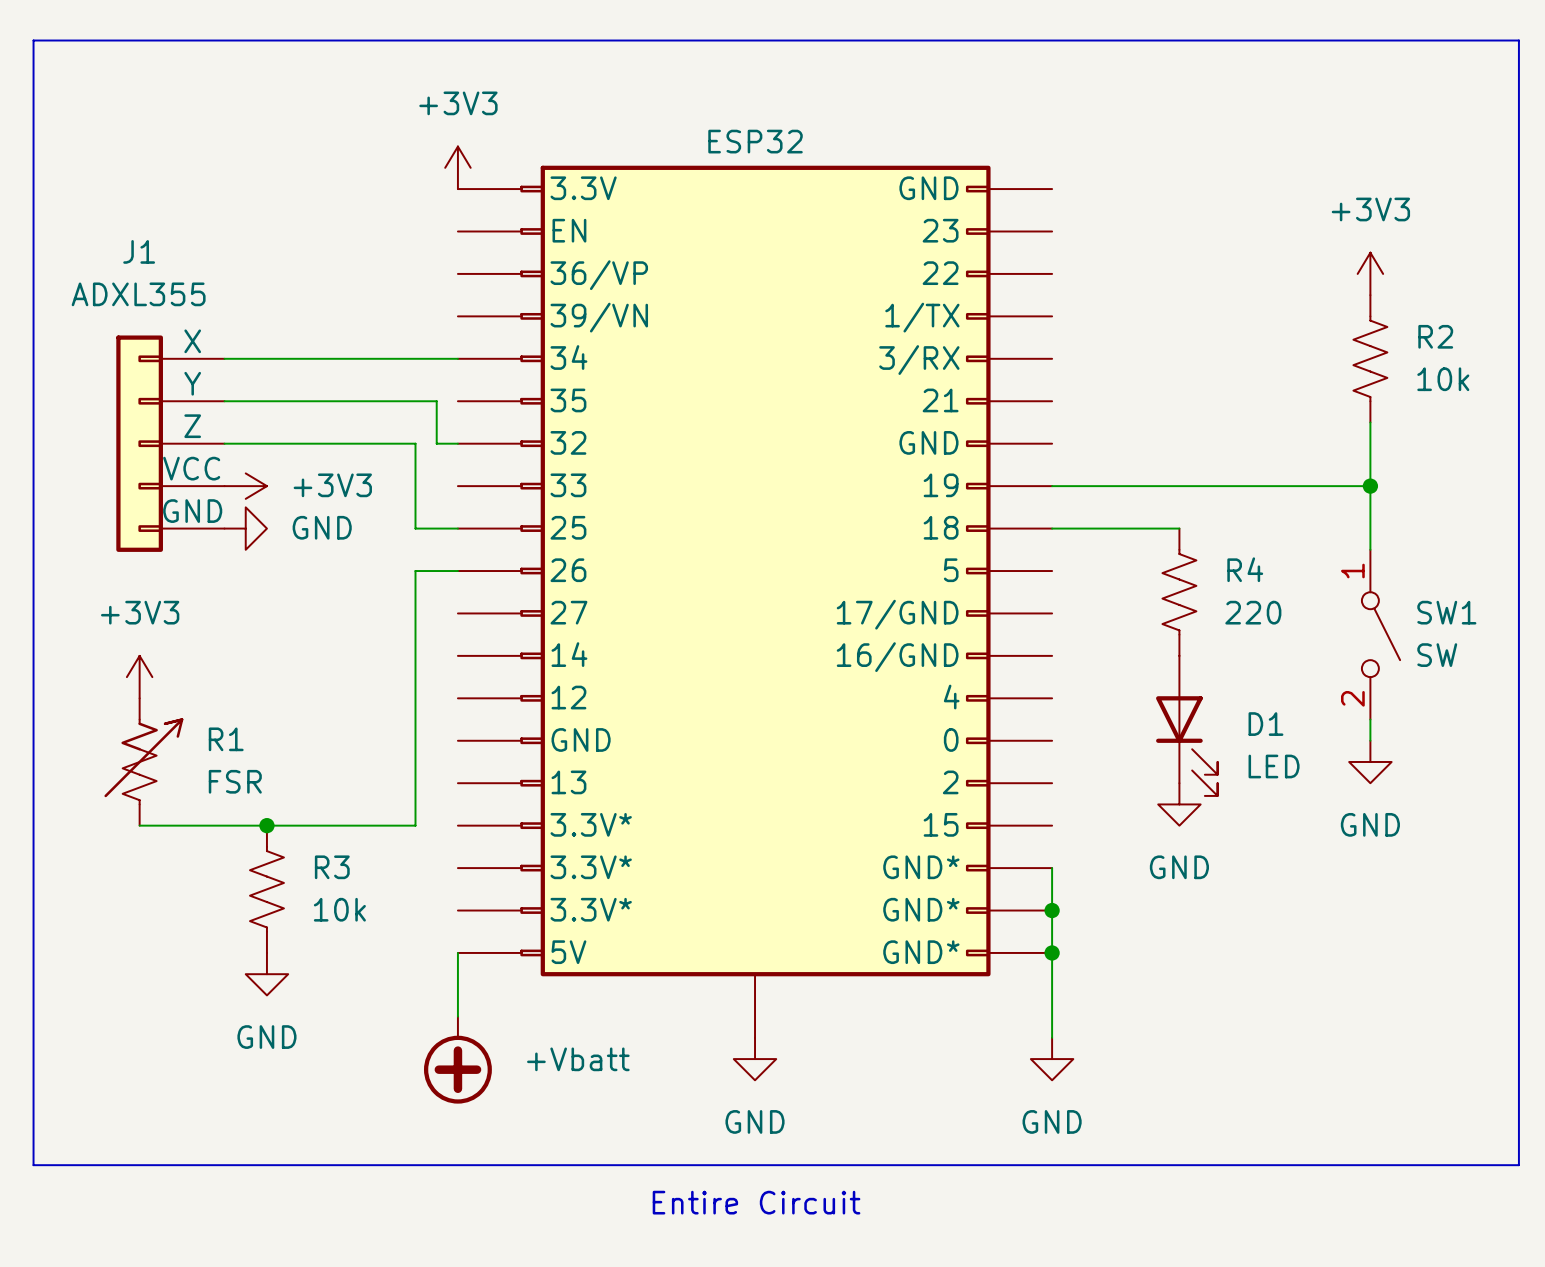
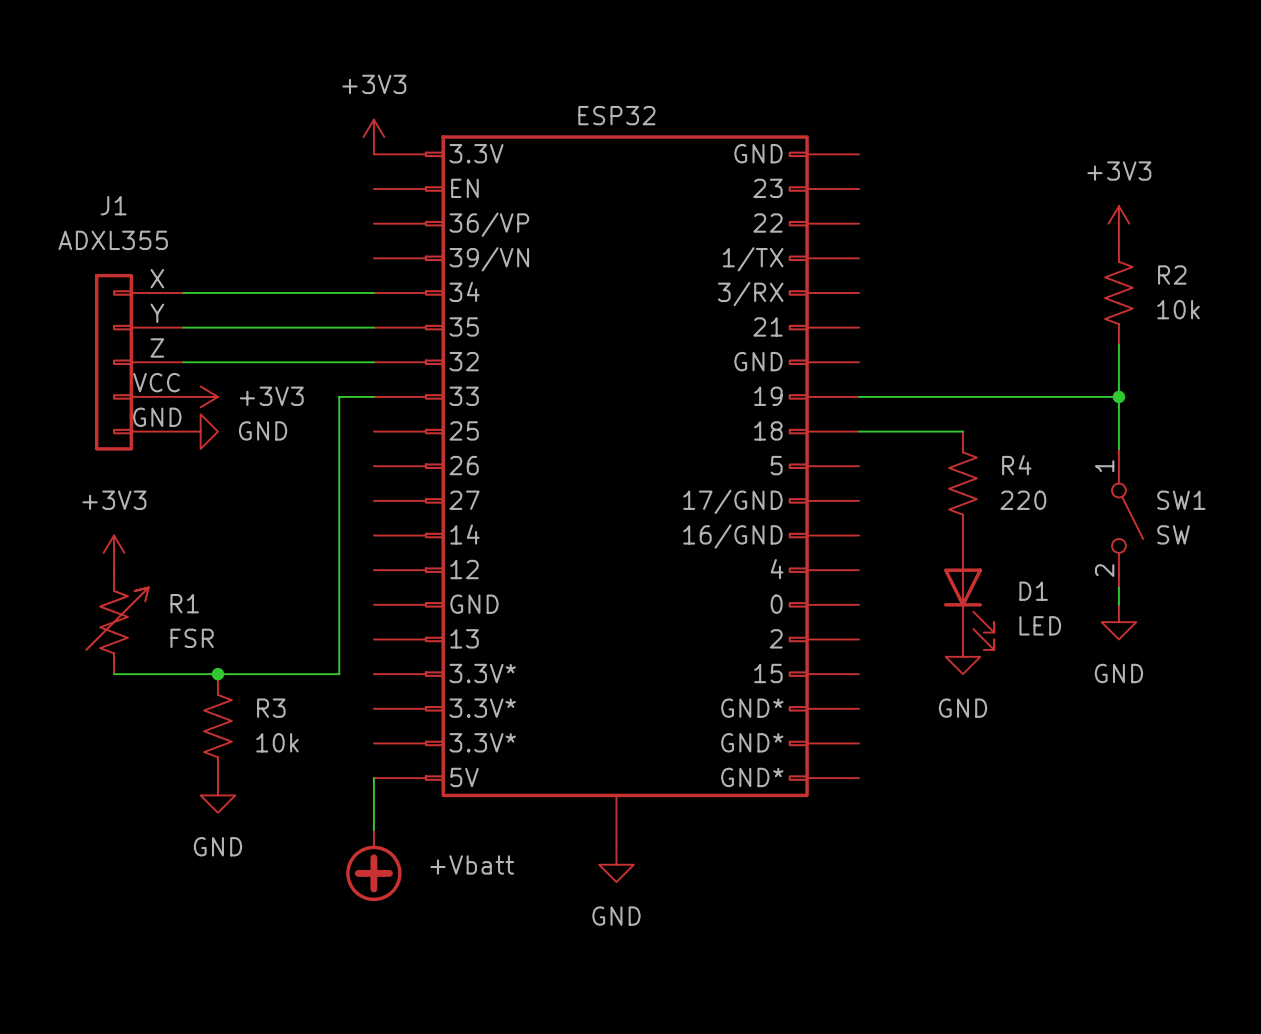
bus: (33, 40) (33, 1165) (1518, 1165) (1518, 40) (33, 40) -> none
wire: (436, 401) (436, 443) -> (356, 327) (373, 327)
wire: (415, 443) (415, 486) -> (339, 362) (356, 362)
wire: (415, 528) (457, 528) -> (339, 431) (339, 466)
wire: (415, 571) (457, 571) -> (339, 396) (373, 396)
wire: (1052, 868) (1052, 1037) -> none
junction: (1052, 910) -> none
junction: (1052, 952) -> none
power symbol: GND (1052, 1059) -> none
text: Entire Circuit (756, 1202) -> none

